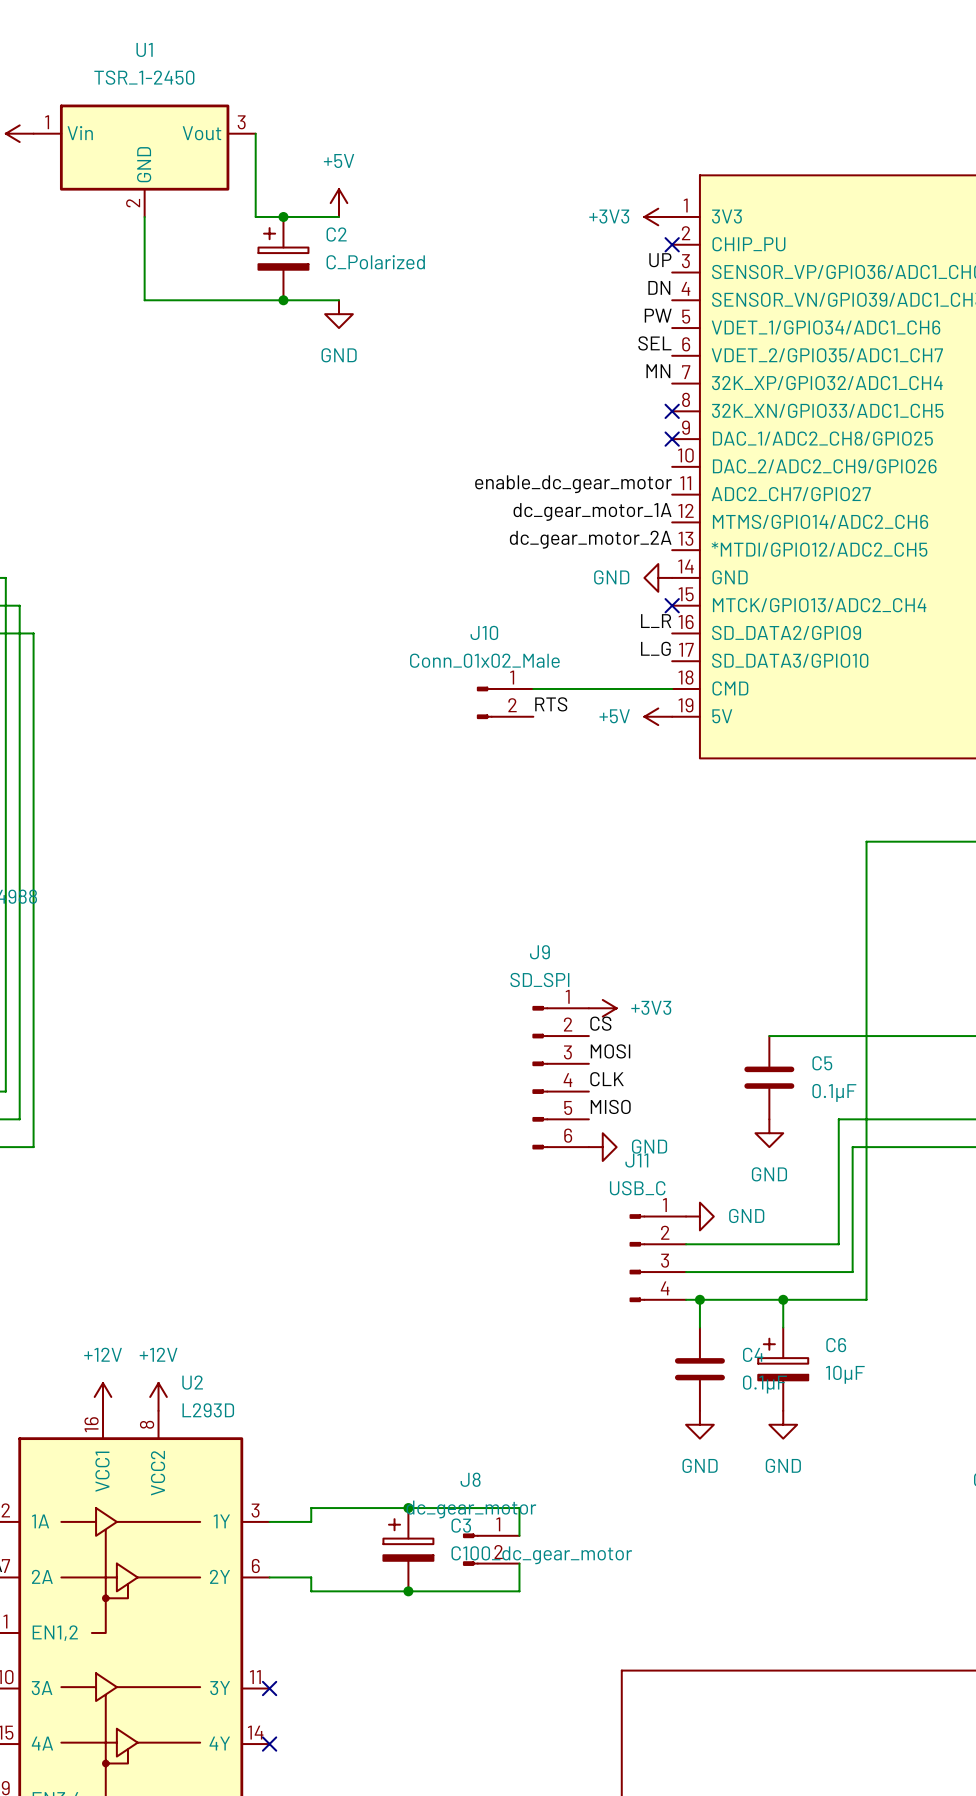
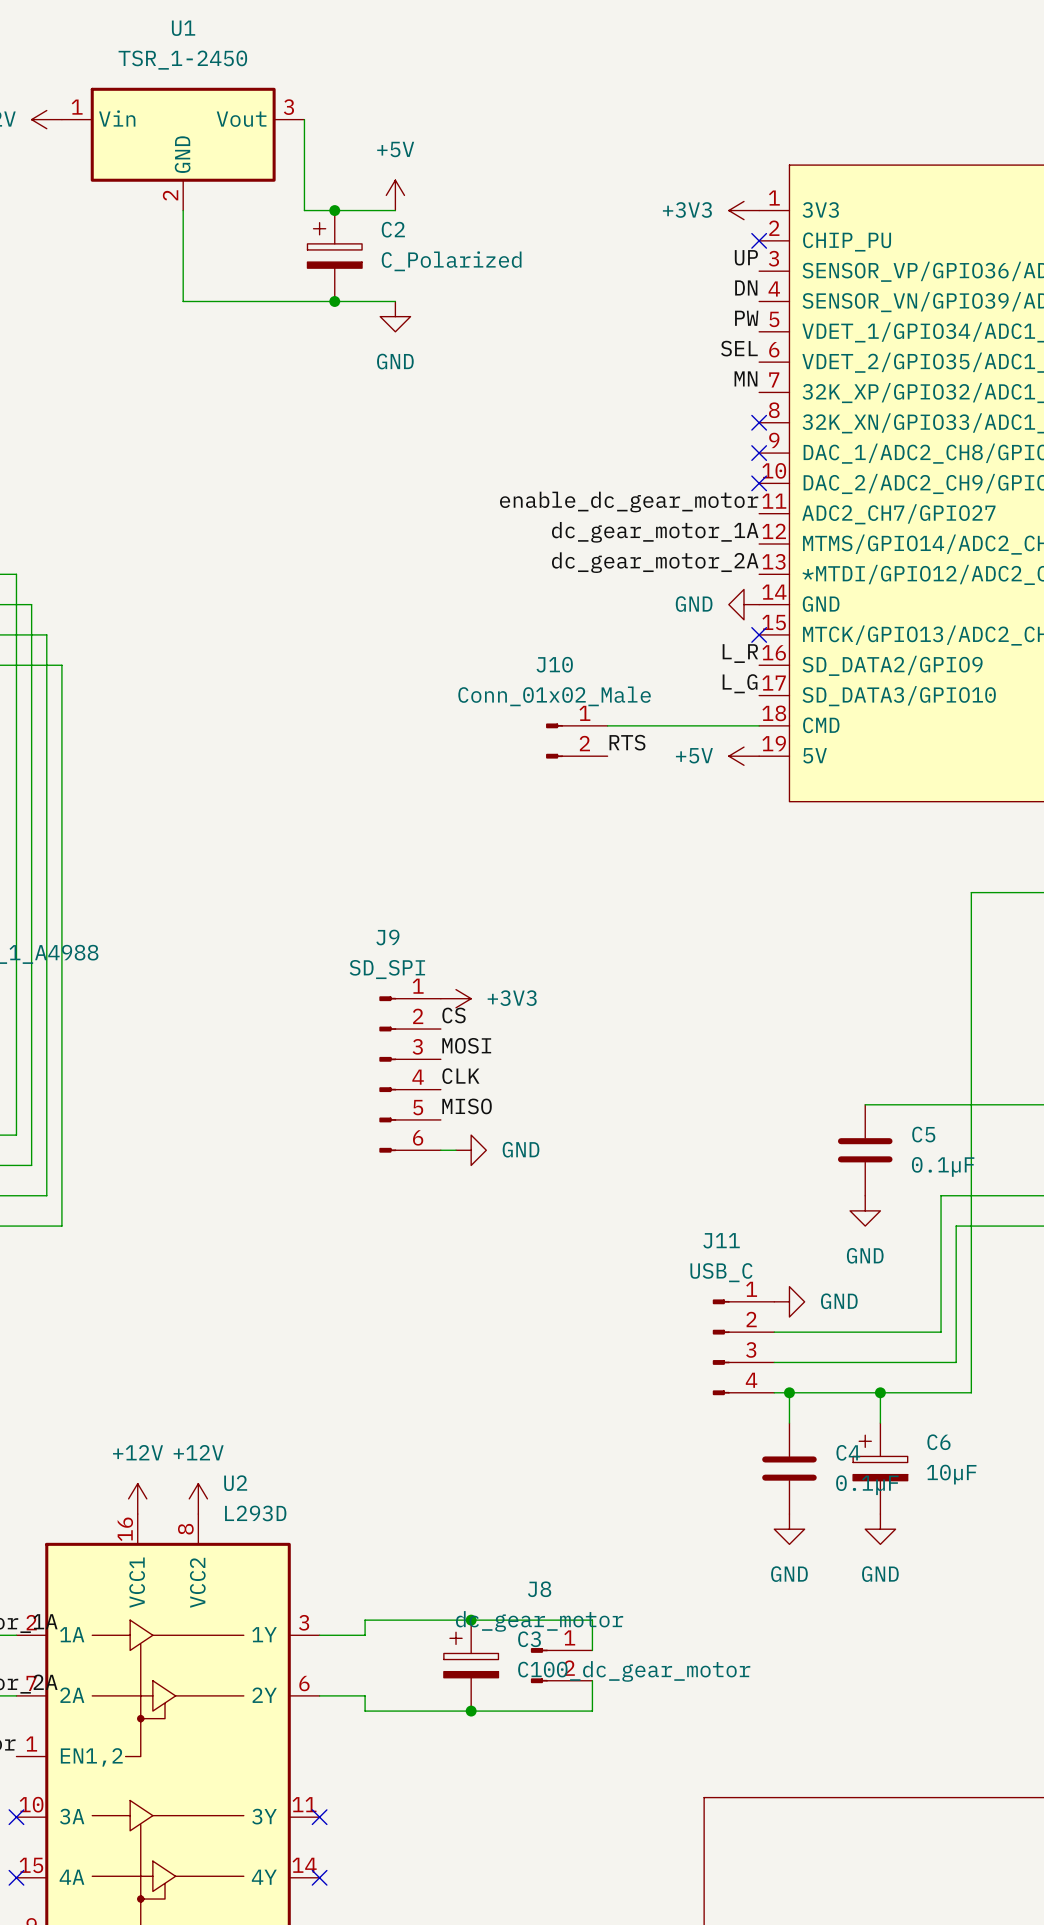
no-connect mark: none -> (759, 483)
power symbol position: +3V3 (602, 1008) -> +3V3 (456, 998)
label position: CS (600, 1023) -> CS (454, 1015)
label position: MOSI (610, 1051) -> MOSI (466, 1045)
wire: none -> (440, 1150) (456, 1150)
J9 position: (560, 1077) -> (410, 1074)
label position: CLK (607, 1079) -> CLK (460, 1076)
label position: MISO (610, 1106) -> MISO (467, 1106)
power symbol position: GND (602, 1147) -> GND (471, 1150)

